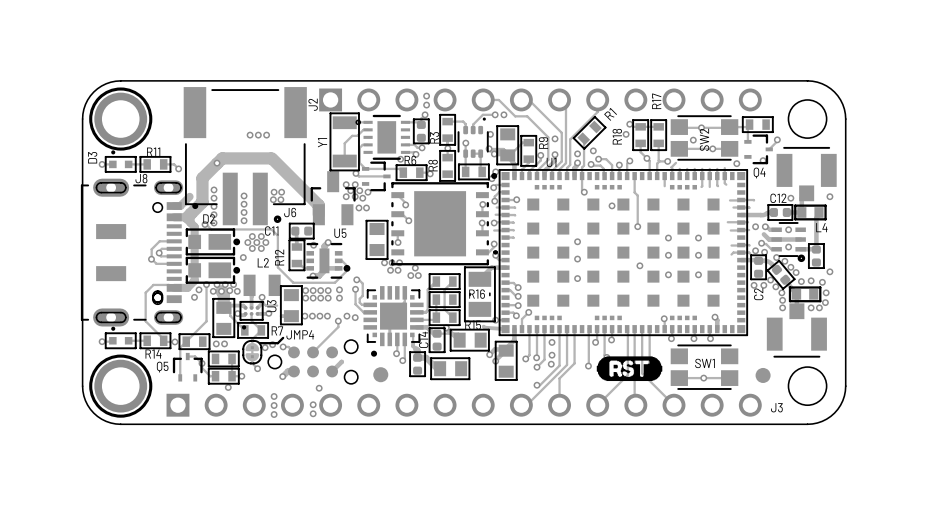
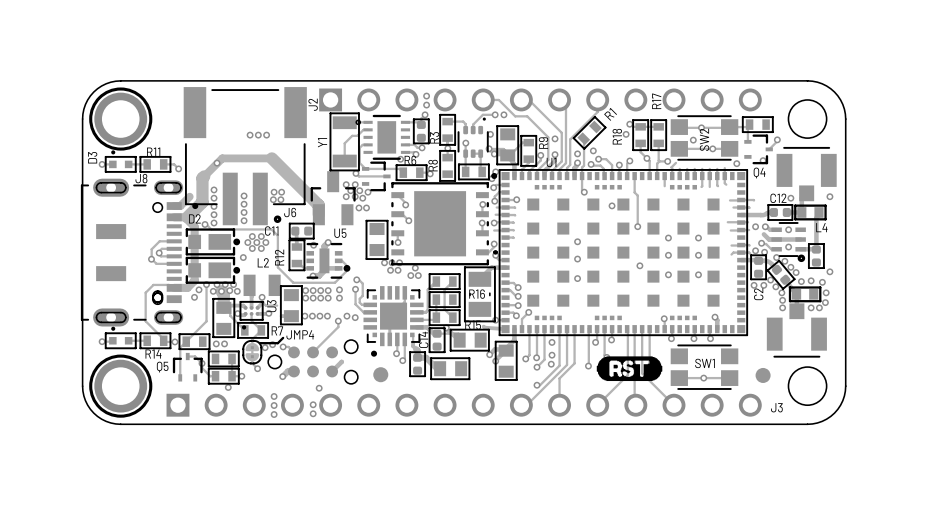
track width: thick (270, 158) (222, 158) (204, 176) -> thin (270, 158) (222, 158) (204, 176)
D2 name position: D2 (209, 218) -> D2 (194, 218)

